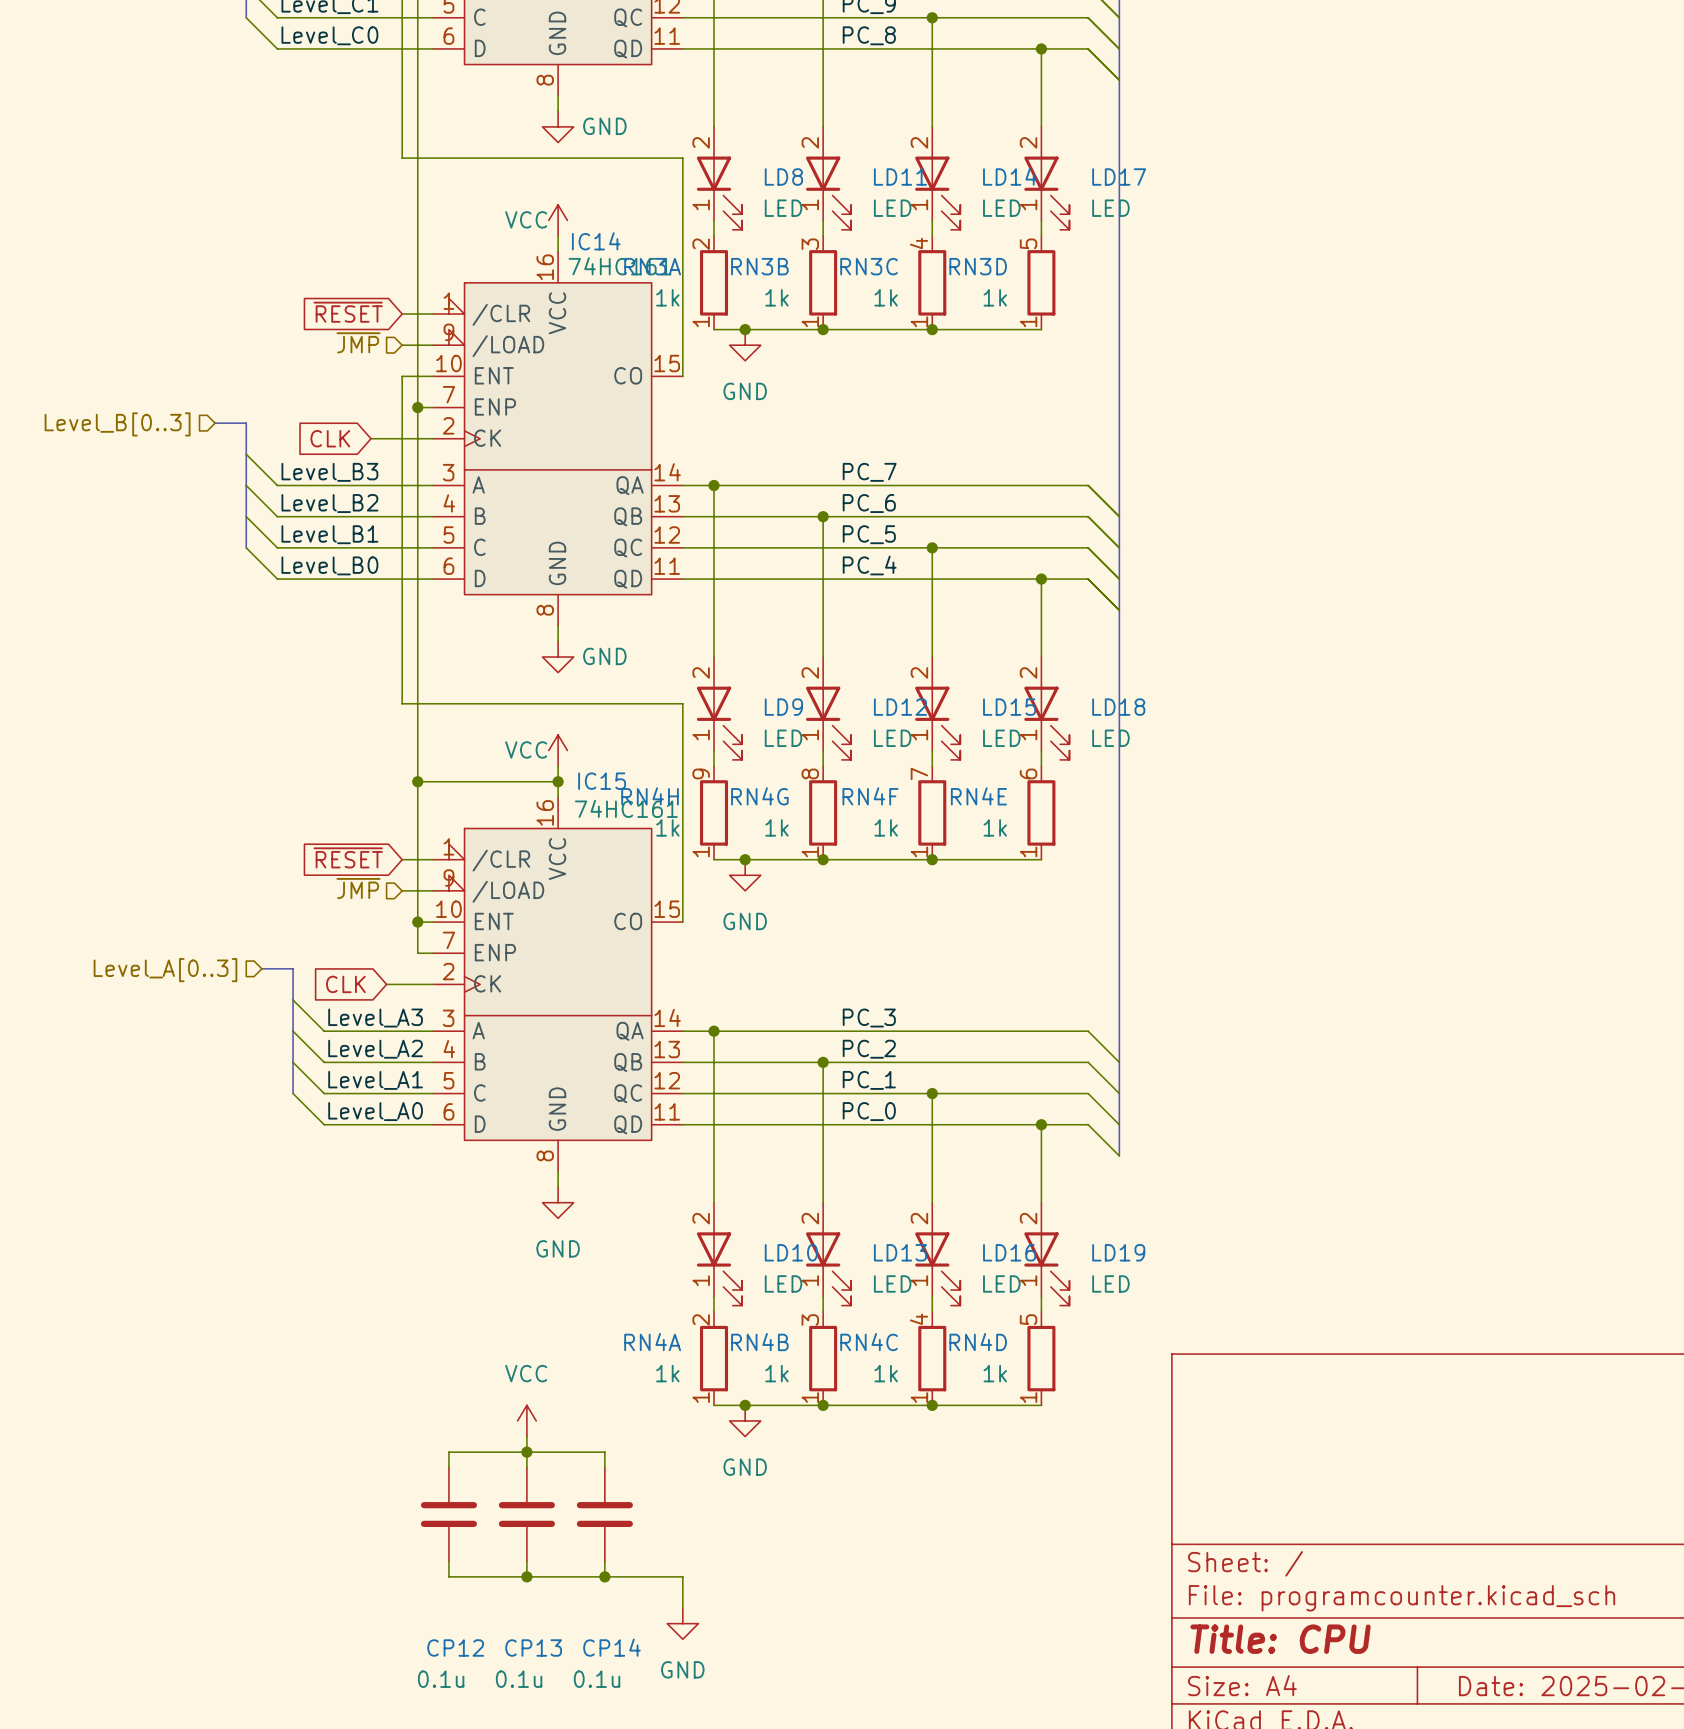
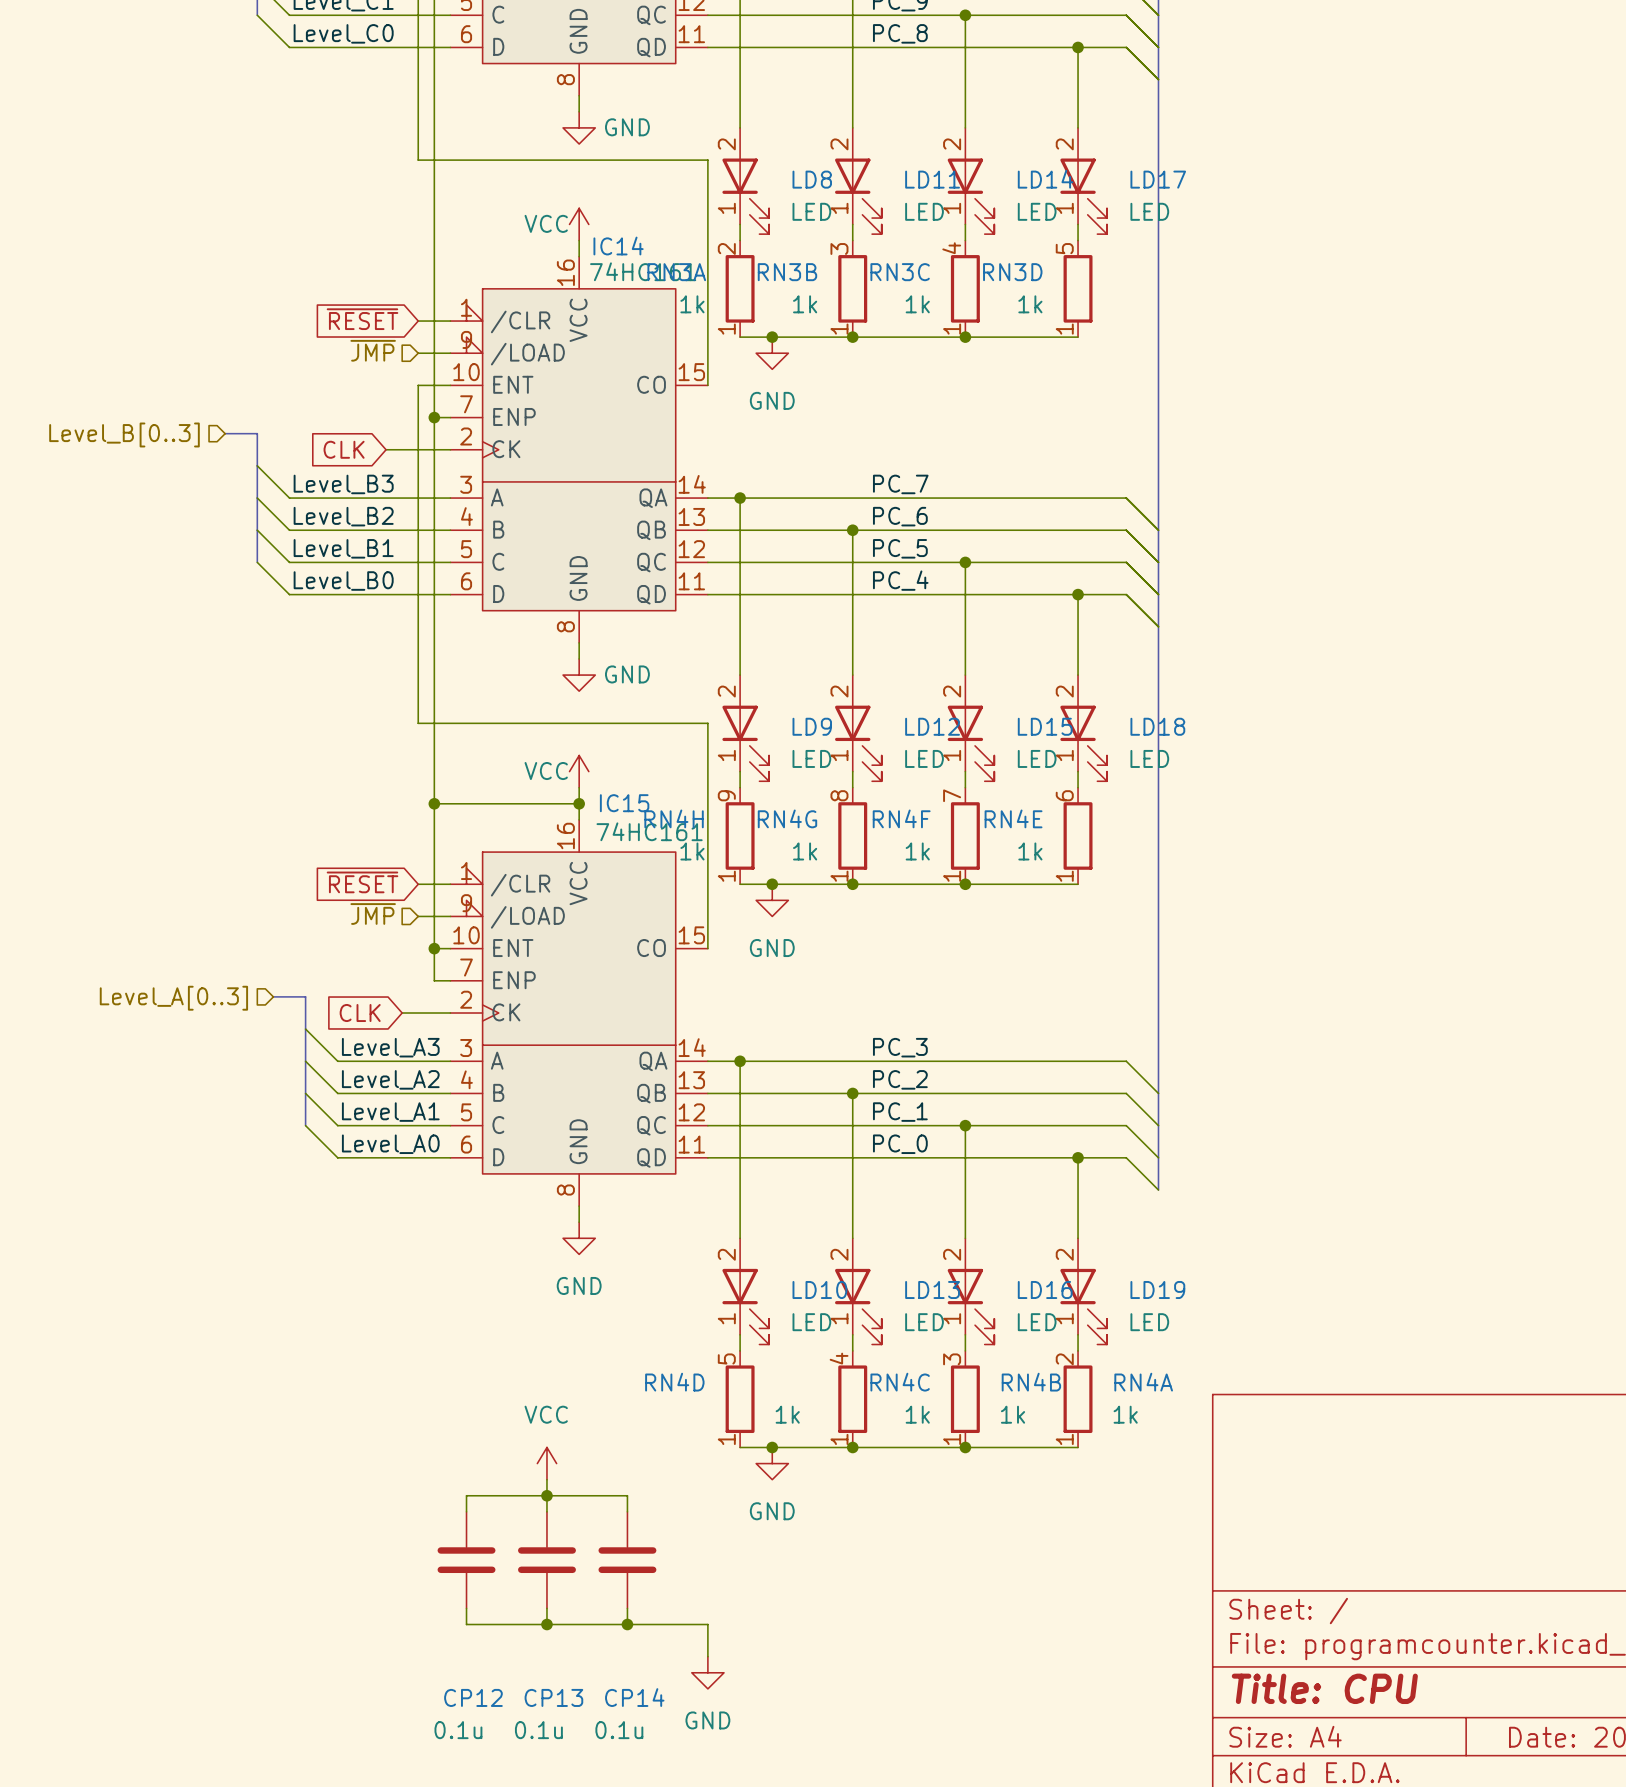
RN4A name position: RN4A (652, 1342) -> RN4A (1143, 1382)
RN4B name position: RN4B (759, 1342) -> RN4B (1031, 1382)
RN4A position: (714, 1358) -> (1078, 1399)
RN4B position: (823, 1358) -> (965, 1399)
RN4C position: (932, 1358) -> (852, 1399)
RN4D position: (1041, 1358) -> (740, 1399)
RN4A value position: 1k (667, 1373) -> 1k (1125, 1414)
RN4B value position: 1k (776, 1373) -> 1k (1013, 1414)
RN4D value position: 1k (995, 1373) -> 1k (787, 1414)

